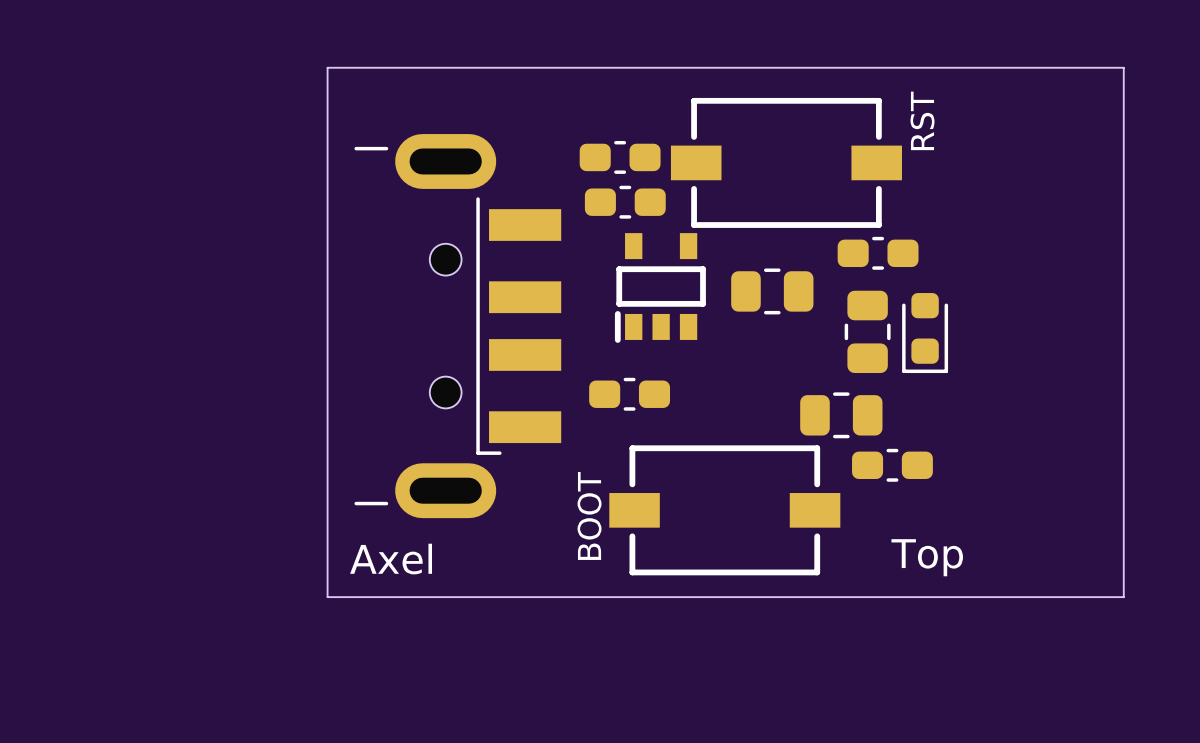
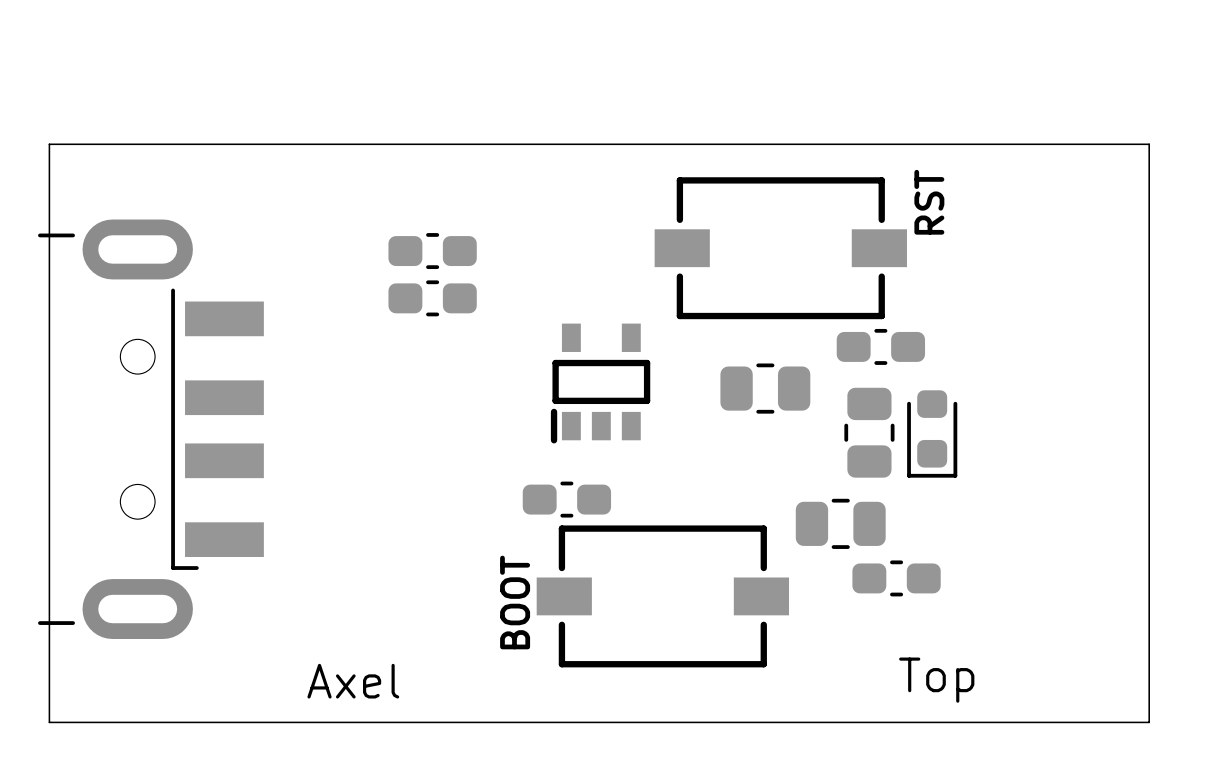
board edge: (327, 67) (327, 597) -> (279, 144) (49, 144) (49, 722) (279, 722)
part: (620, 157) -> none
part: none -> (432, 251)
part: (625, 202) -> none
part: none -> (432, 298)
part position: (660, 287) -> (600, 383)
part position: (457, 326) -> (150, 429)
part position: (629, 394) -> (566, 499)
part position: (724, 510) -> (662, 596)

